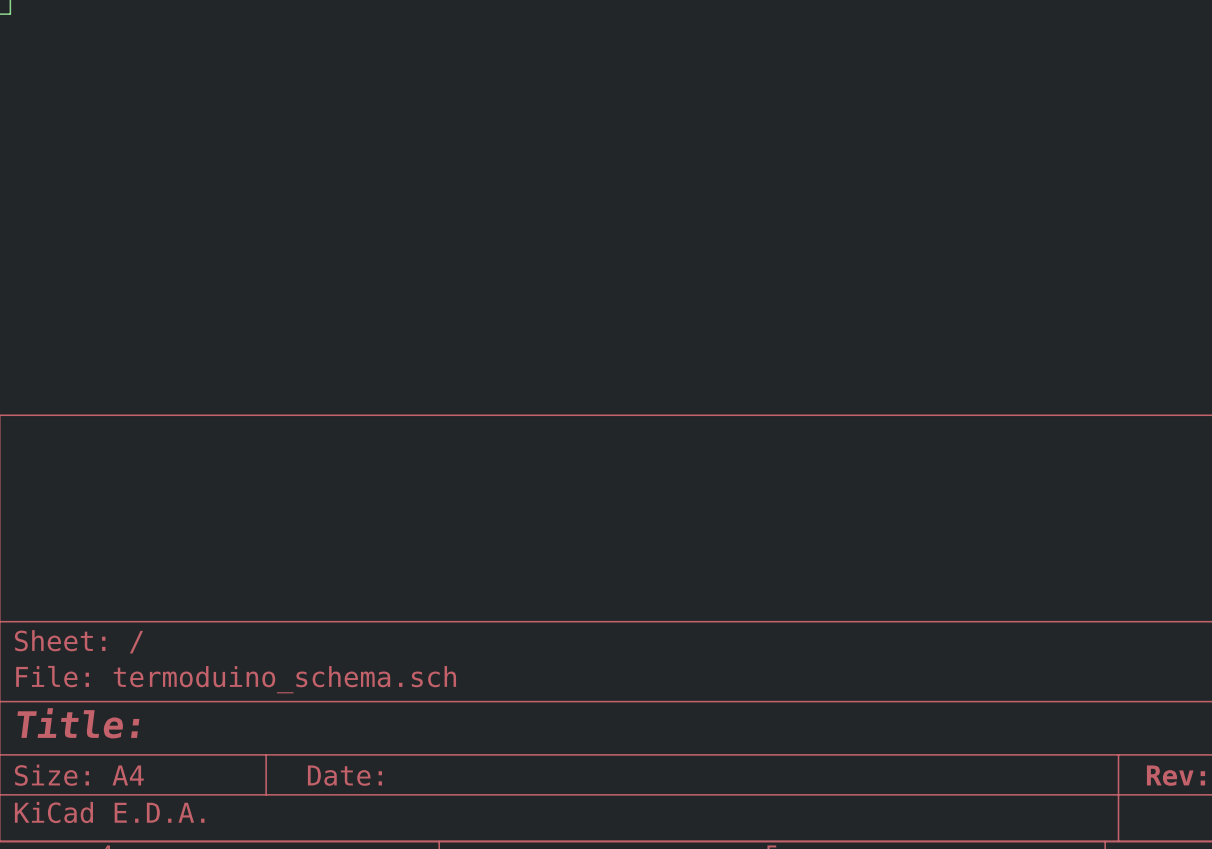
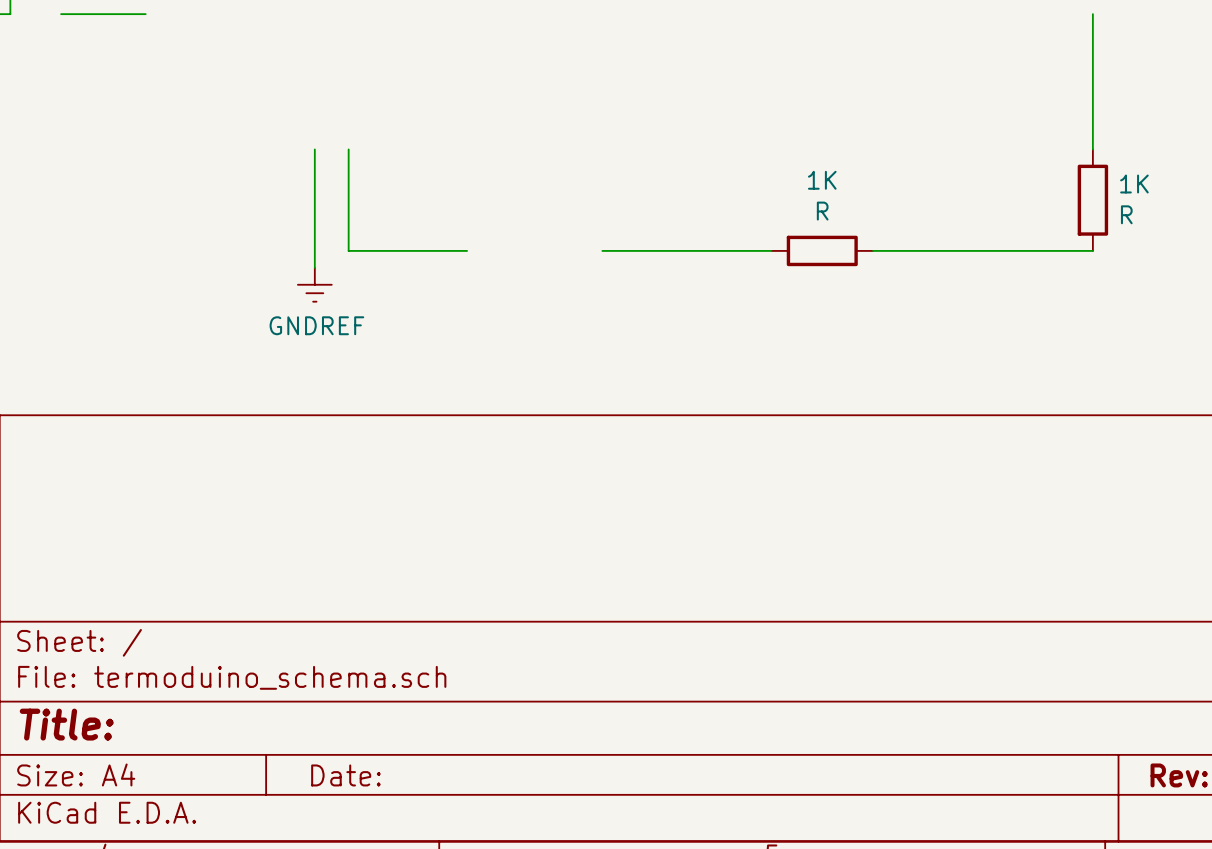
wire: none -> (61, 14) (145, 14)
wire: none -> (1092, 14) (1092, 149)
wire: none -> (314, 149) (314, 267)
wire: none -> (348, 149) (348, 250) (467, 250)
1K: none -> R (1092, 200)
wire: none -> (602, 250) (771, 250)
1K: none -> R (822, 250)
wire: none -> (873, 250) (1092, 250)
power symbol: none -> GNDREF (314, 284)

